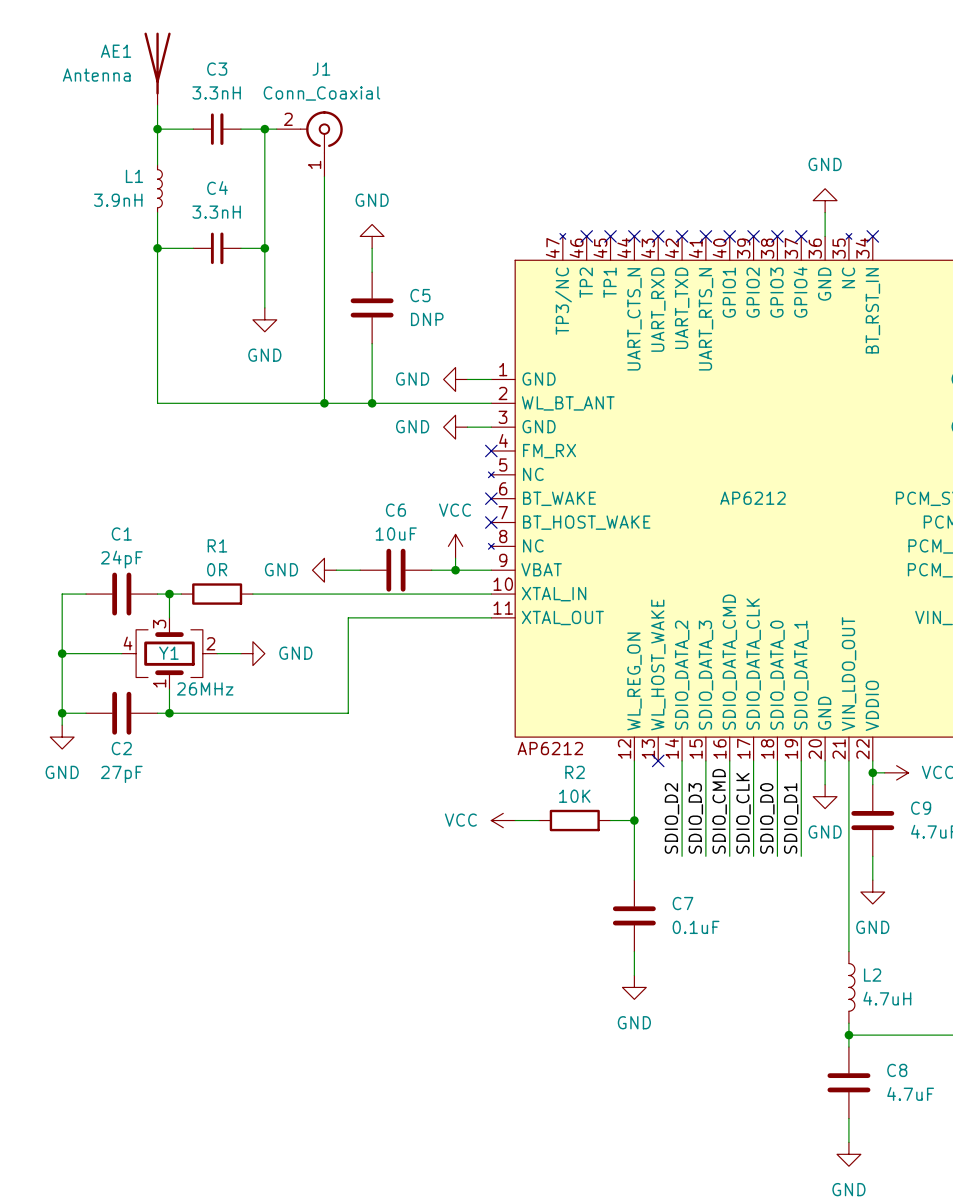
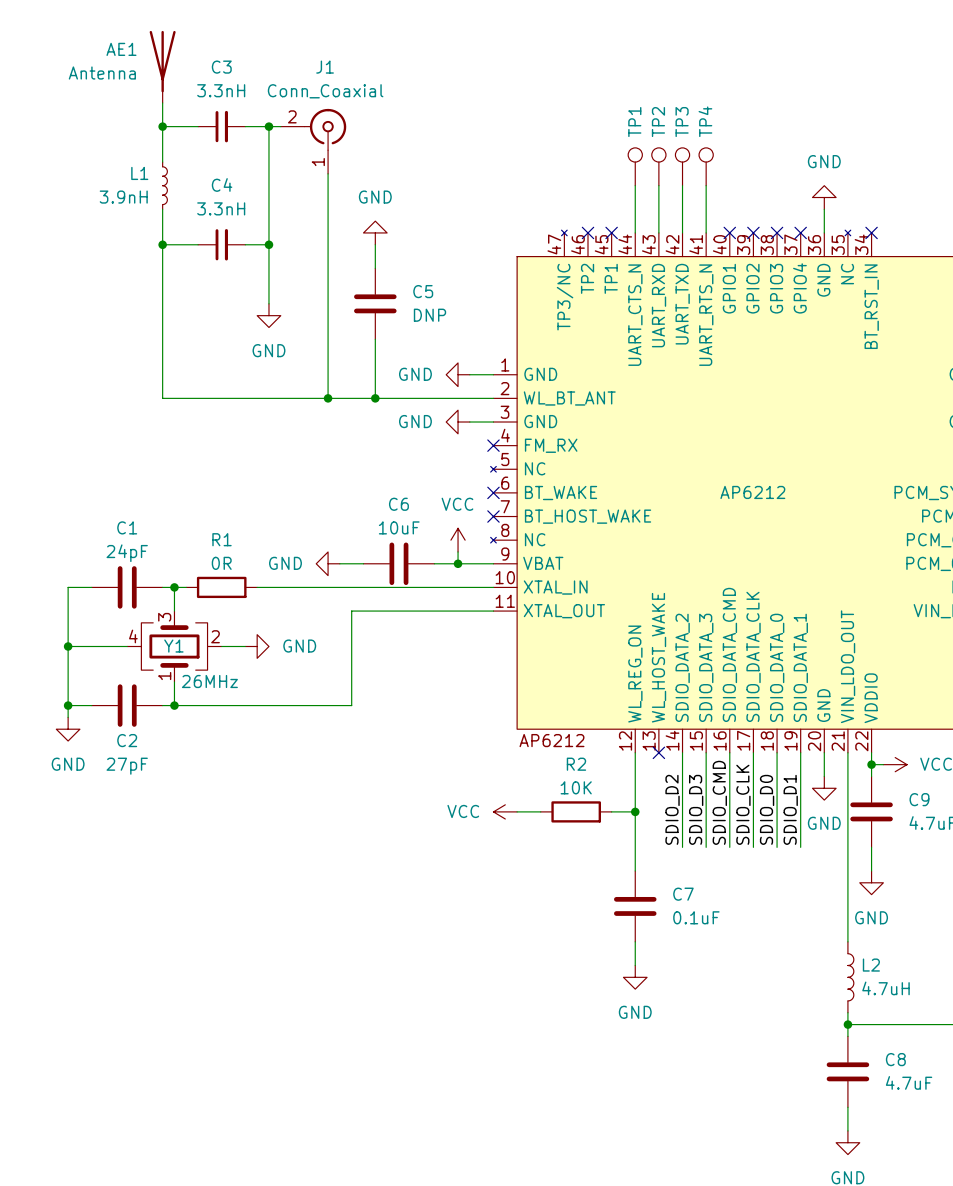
TP1: none -> (635, 166)
TP2: none -> (658, 166)
TP3: none -> (682, 166)
TP4: none -> (706, 166)
wire: none -> (635, 185) (635, 232)
wire: none -> (658, 185) (658, 232)
wire: none -> (682, 185) (682, 232)
wire: none -> (706, 185) (706, 232)
no-connect mark: (634, 236) -> none
no-connect mark: (658, 236) -> none
no-connect mark: (682, 236) -> none
no-connect mark: (705, 236) -> none

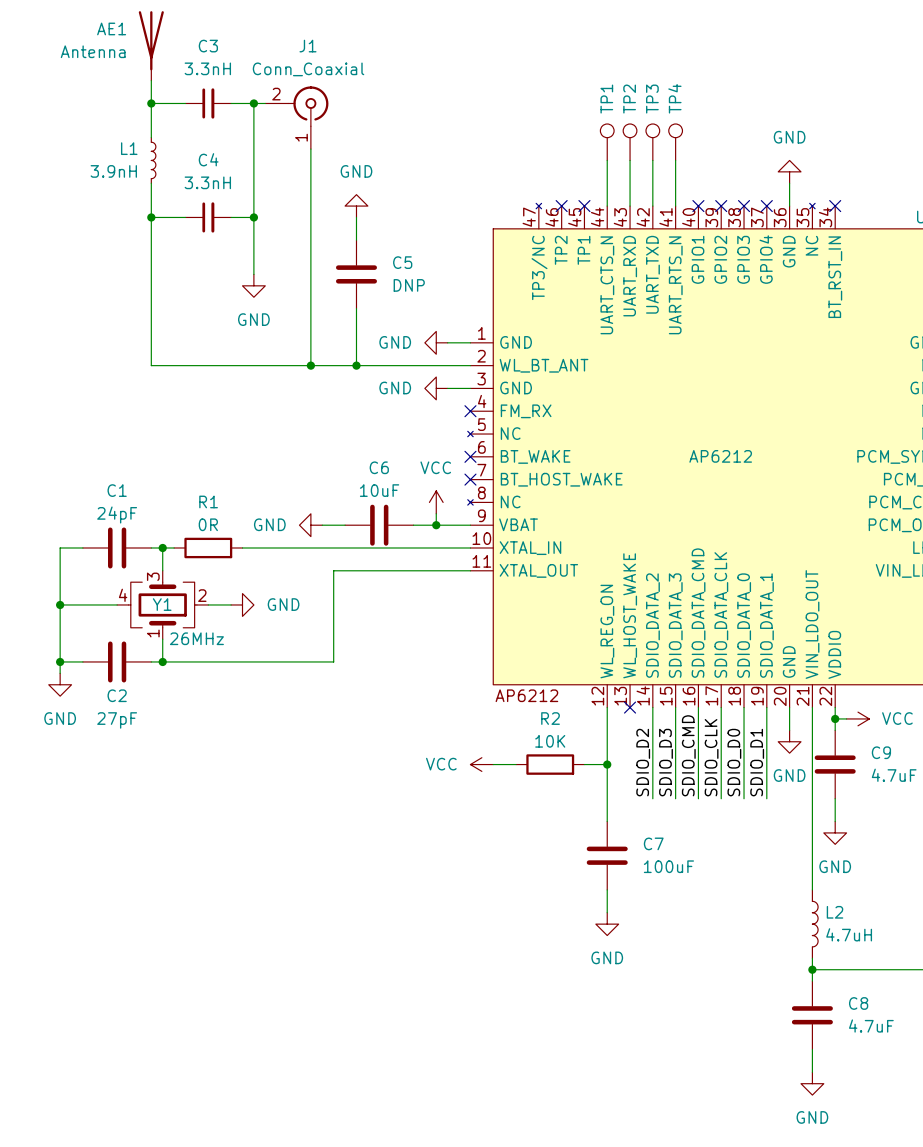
C7 value: 0.1uF (696, 917) -> 100uF (668, 866)

